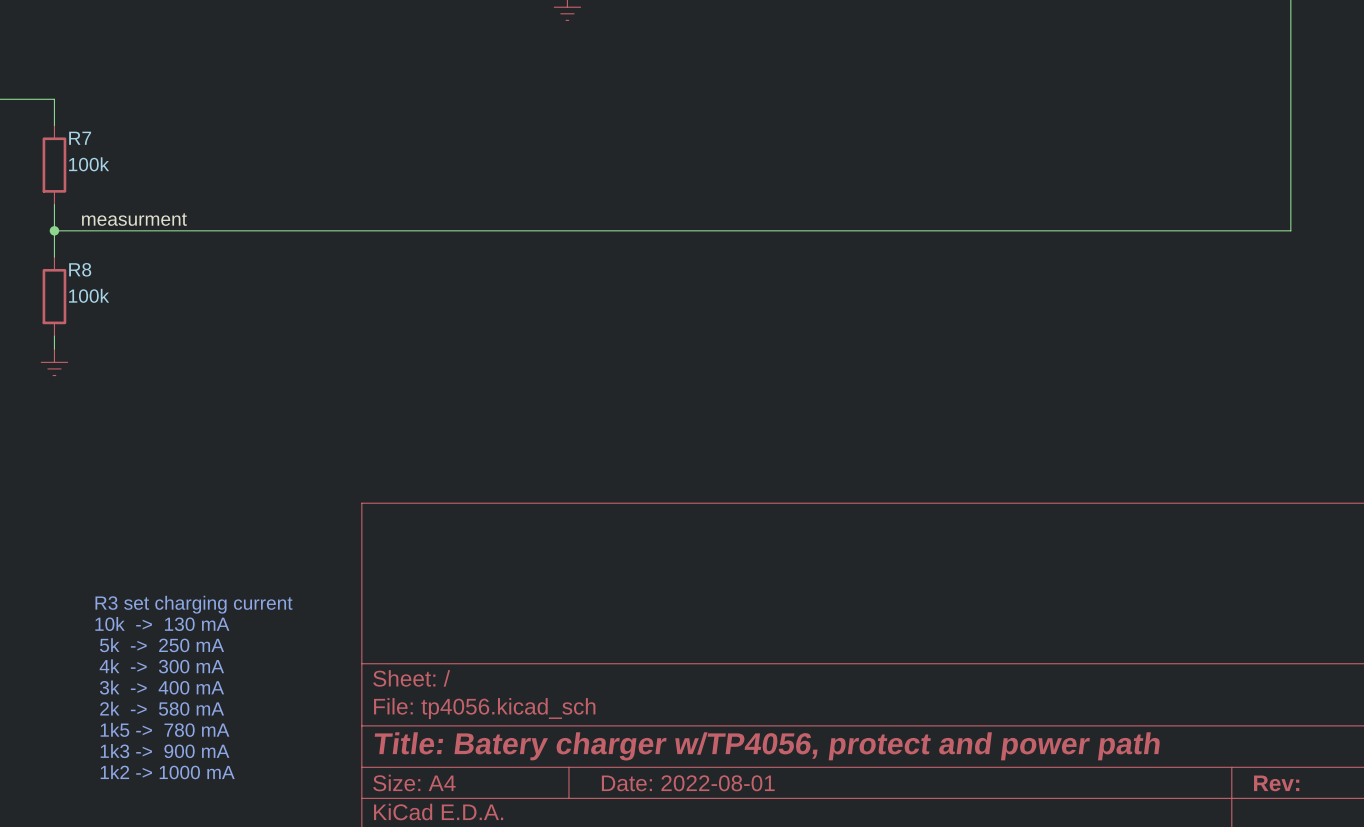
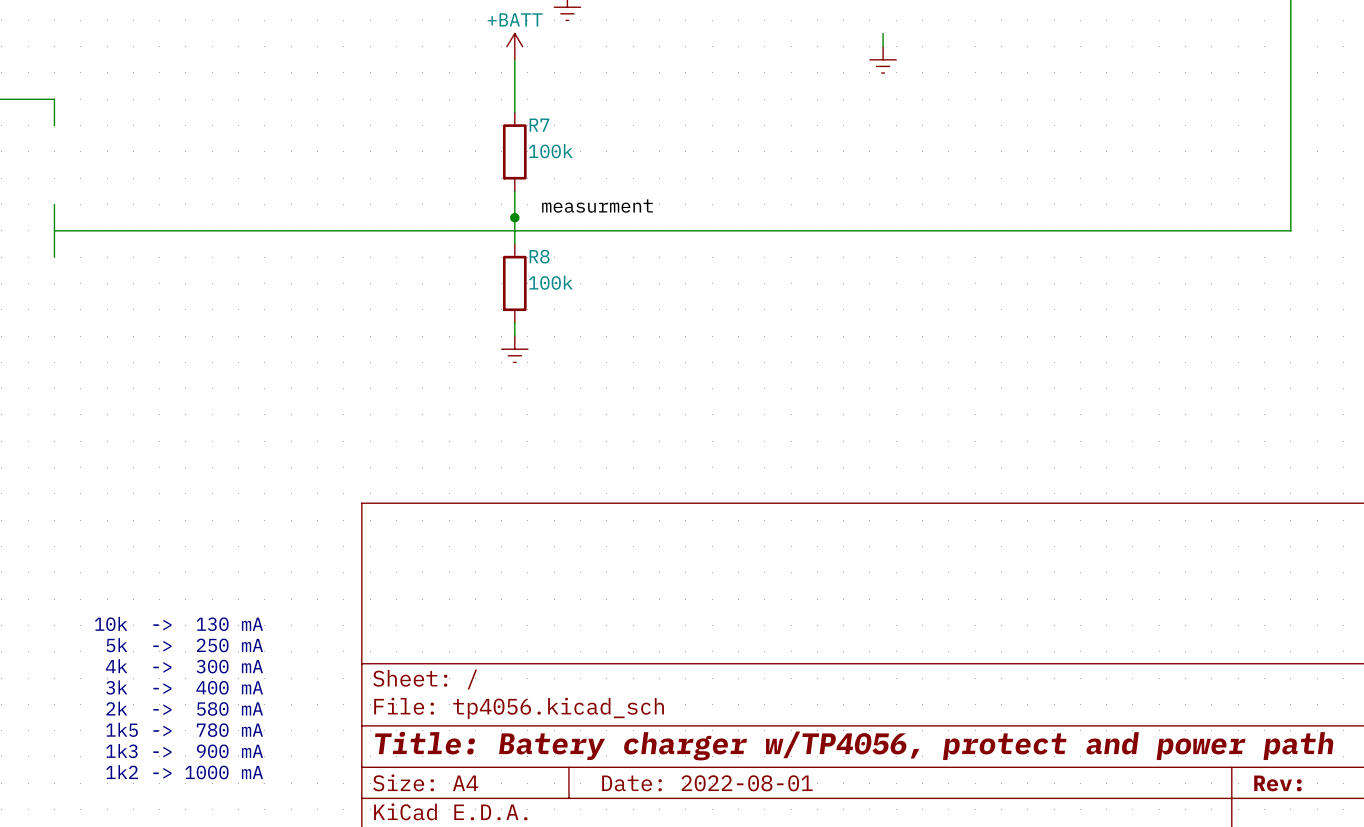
wire: none -> (883, 33) (883, 46)
power symbol: none -> +BATT (514, 46)
wire: none -> (514, 59) (514, 112)
power symbol: none -> (883, 59)
R7 position: (54, 165) -> (514, 151)
wire: none -> (514, 191) (514, 243)
label: none -> measurment (597, 206)
junction: none -> (514, 217)
label: measurment (134, 219) -> none
junction: (54, 230) -> none
R8 position: (54, 296) -> (514, 283)
wire: none -> (514, 322) (514, 336)
wire: (54, 336) (54, 349) -> none
power symbol: none -> (514, 349)
power symbol: (54, 362) -> none
text: R3 set charging current (193, 604) -> none

